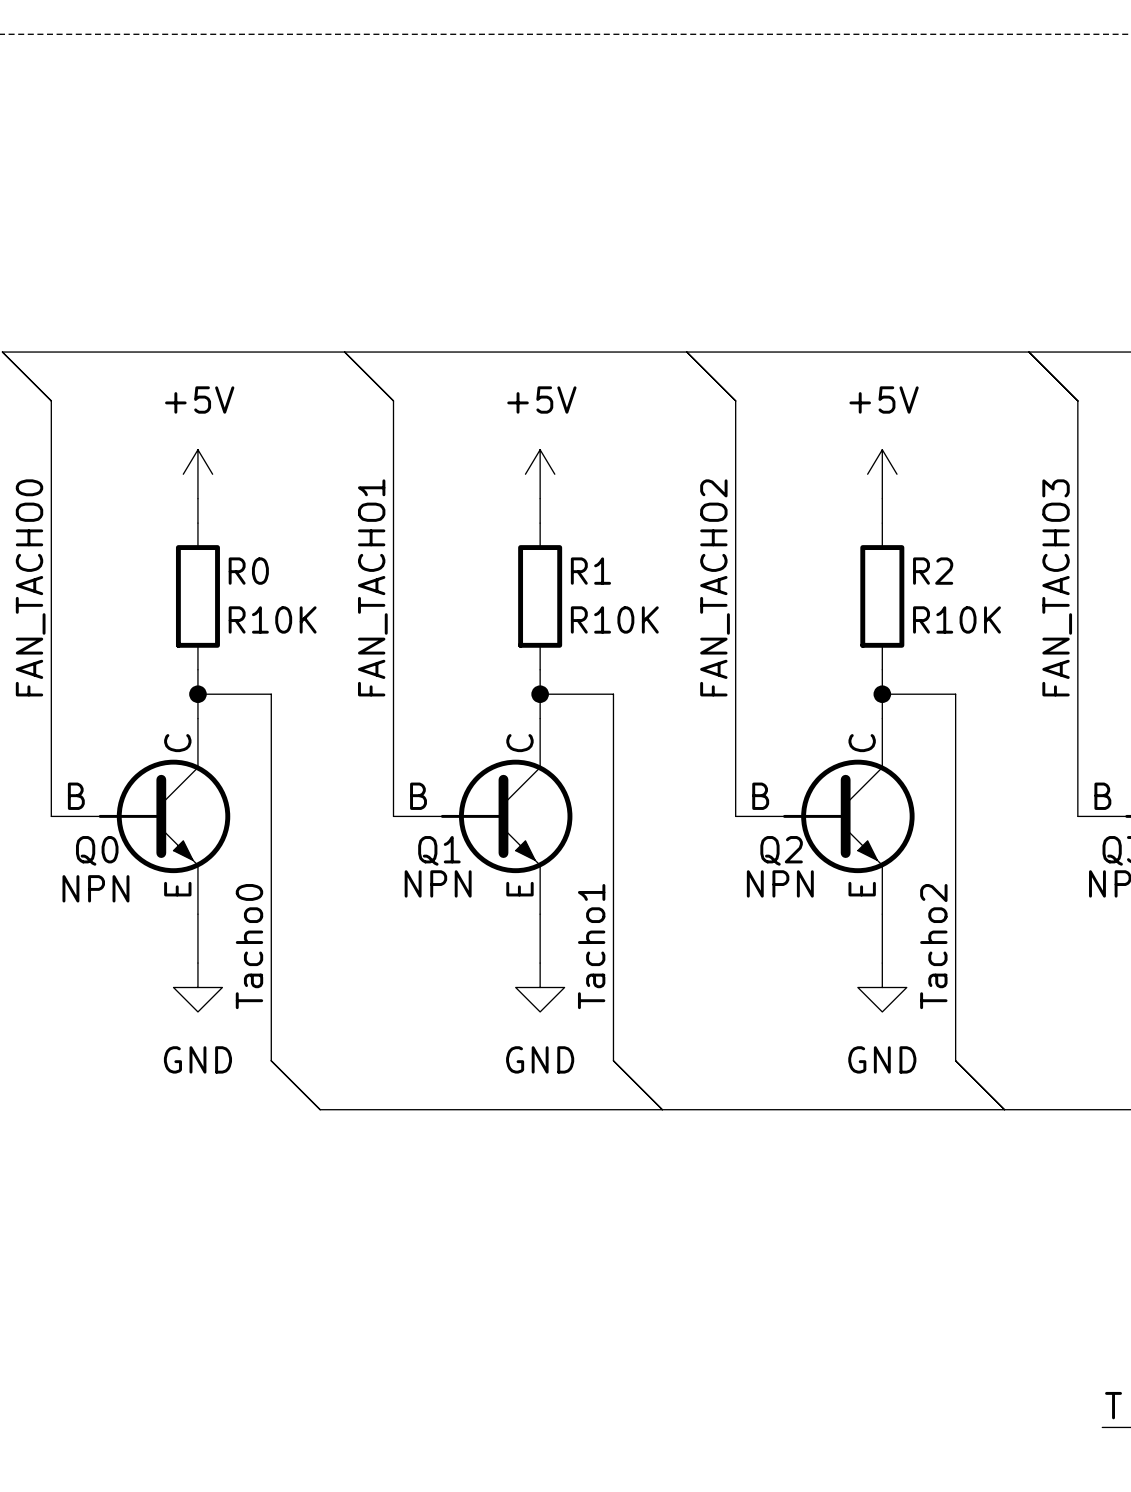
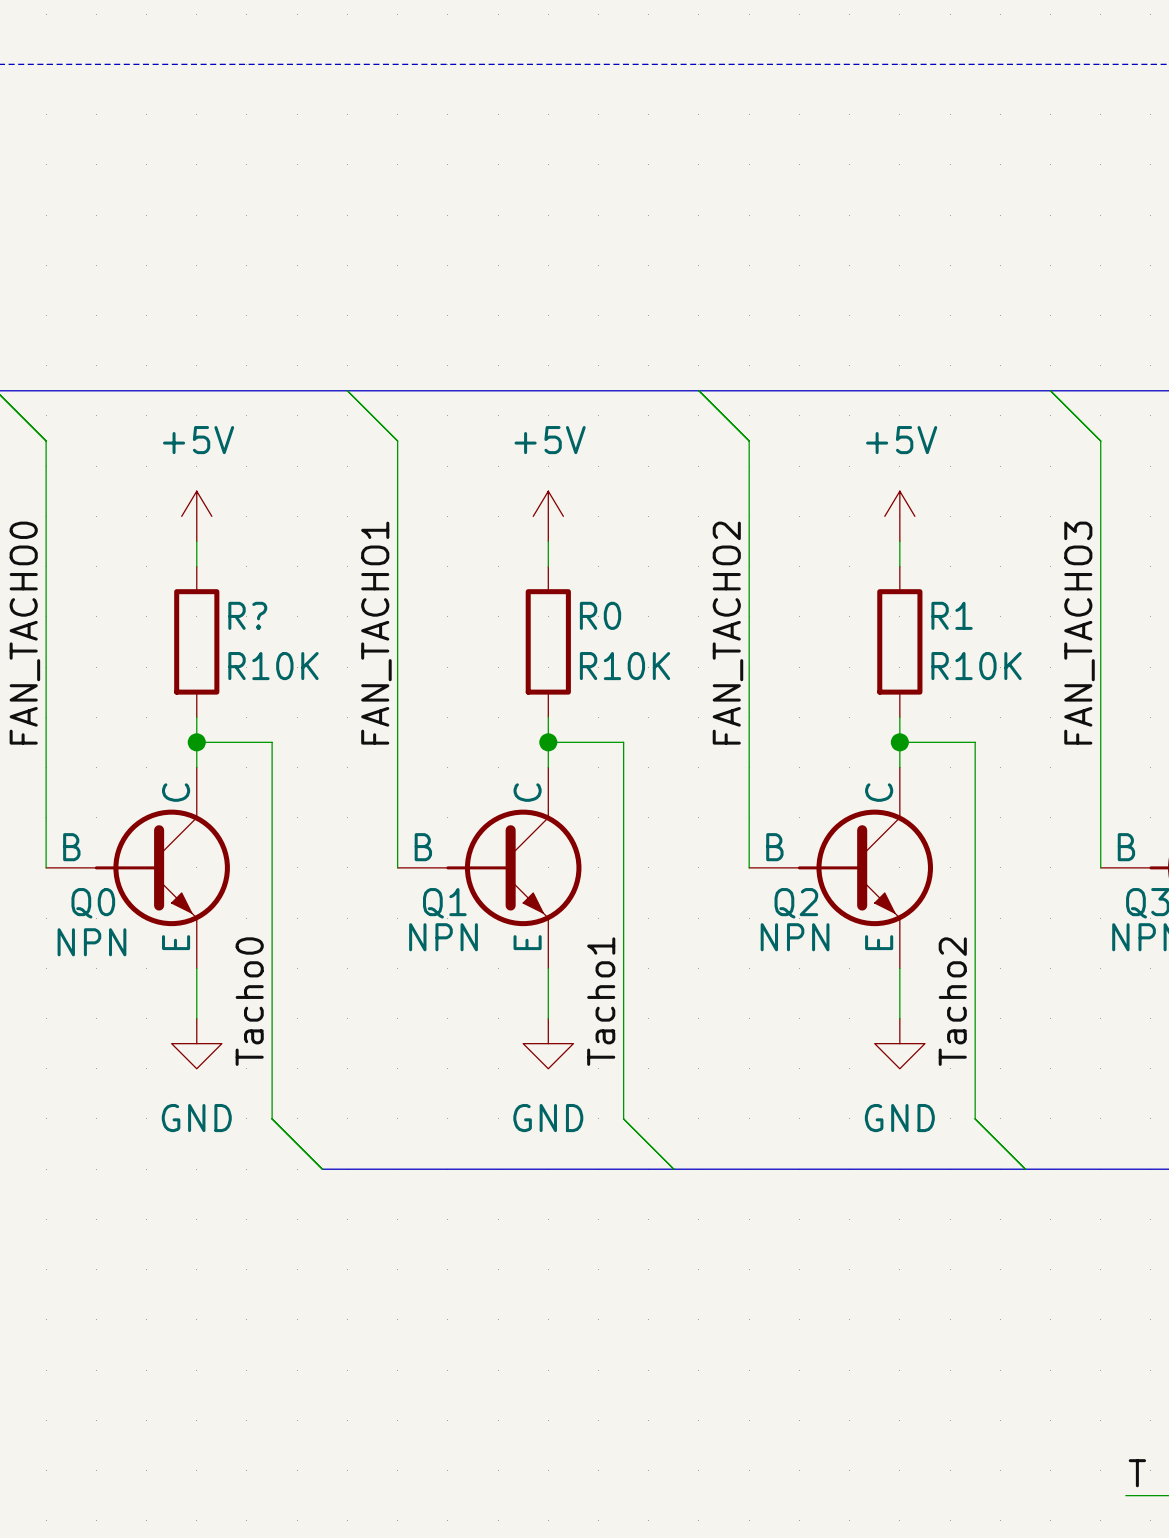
R0 name: R0 (248, 571) -> R? (247, 615)
R1 name: R1 (590, 571) -> R0 (600, 615)
R2 name: R2 (933, 571) -> R1 (952, 615)

